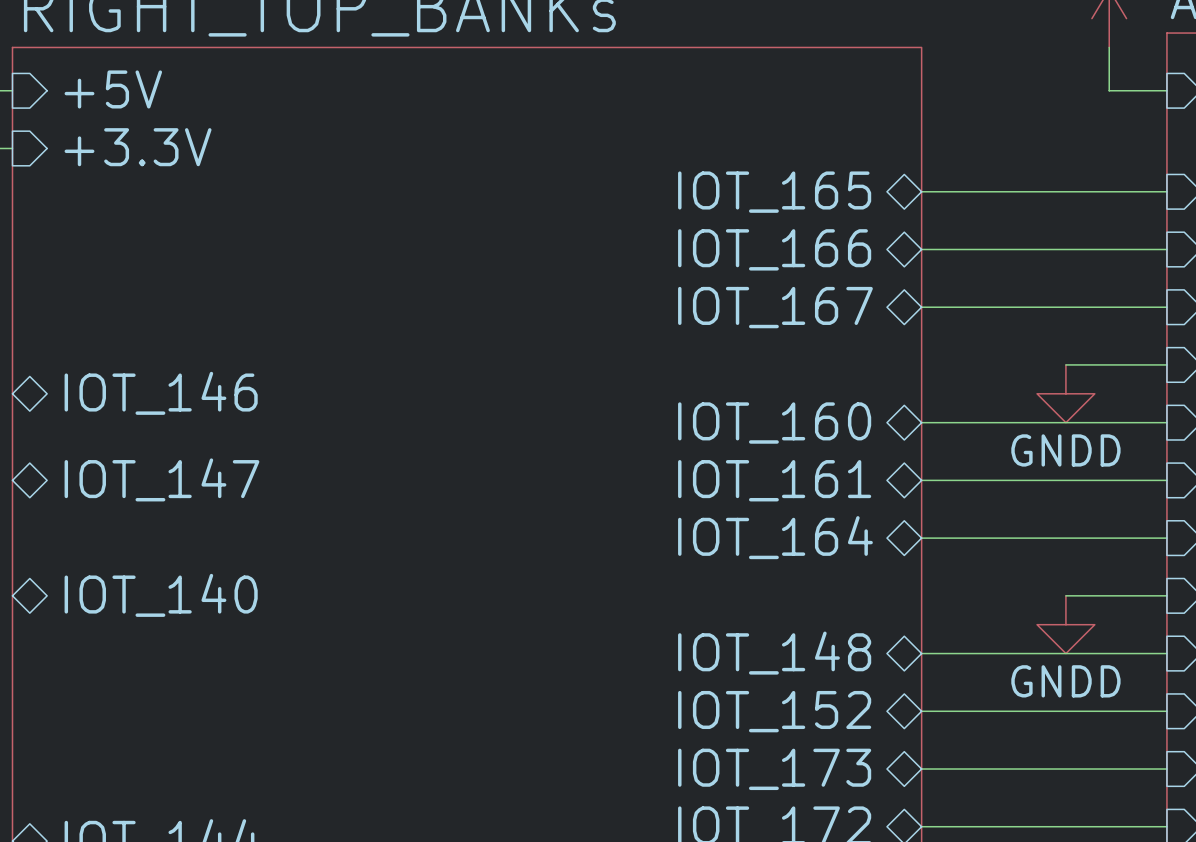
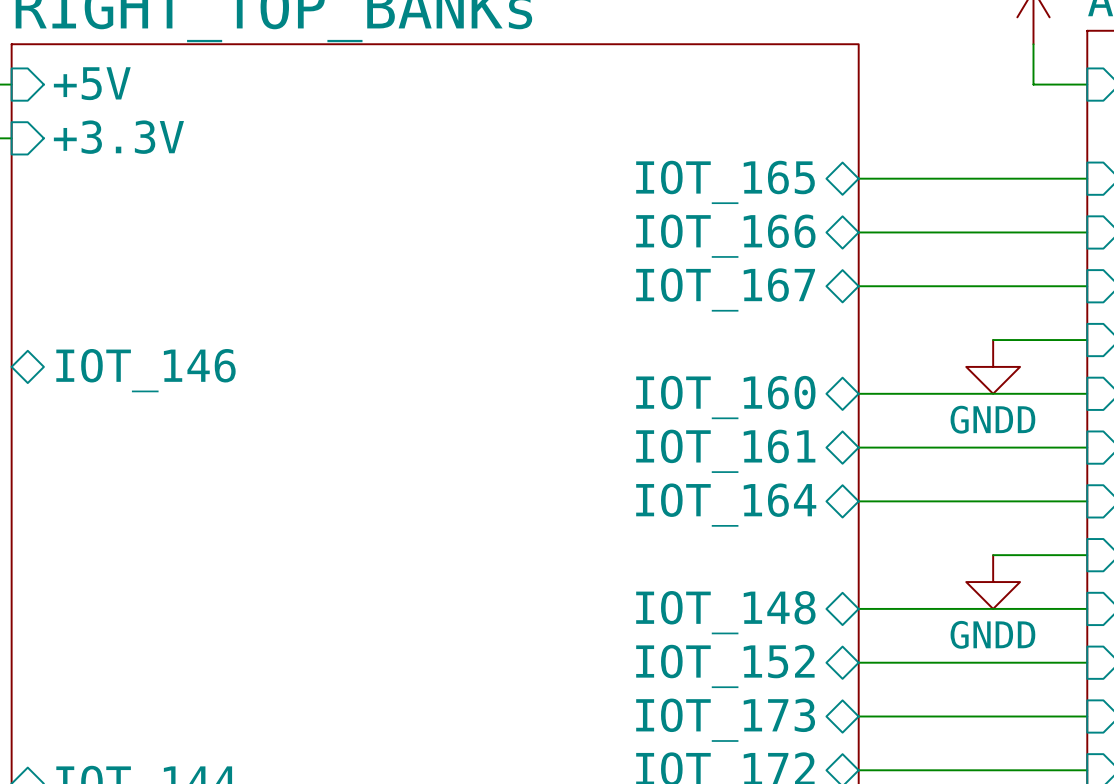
sheet pin: IOT_147 (161, 479) -> none
sheet pin: IOT_140 (161, 595) -> none

